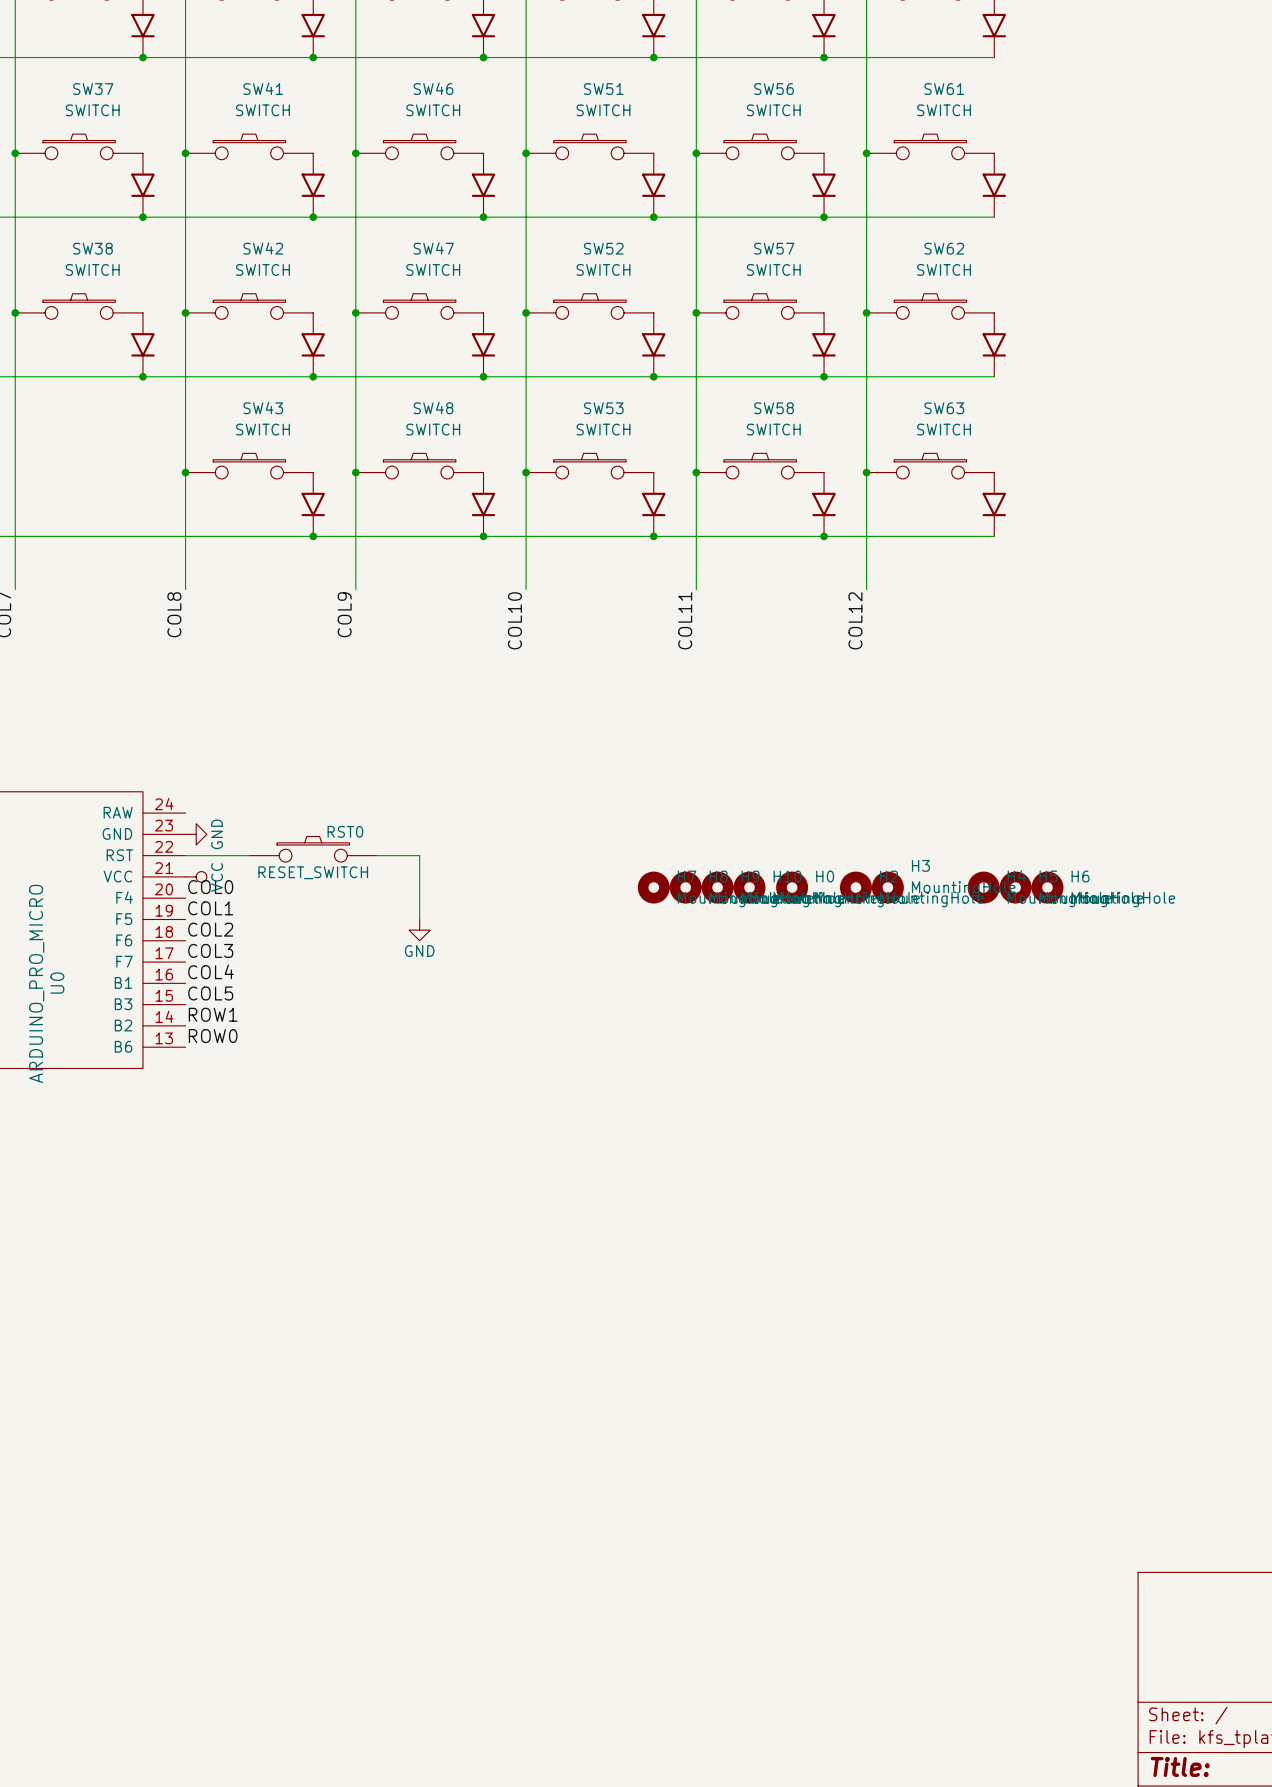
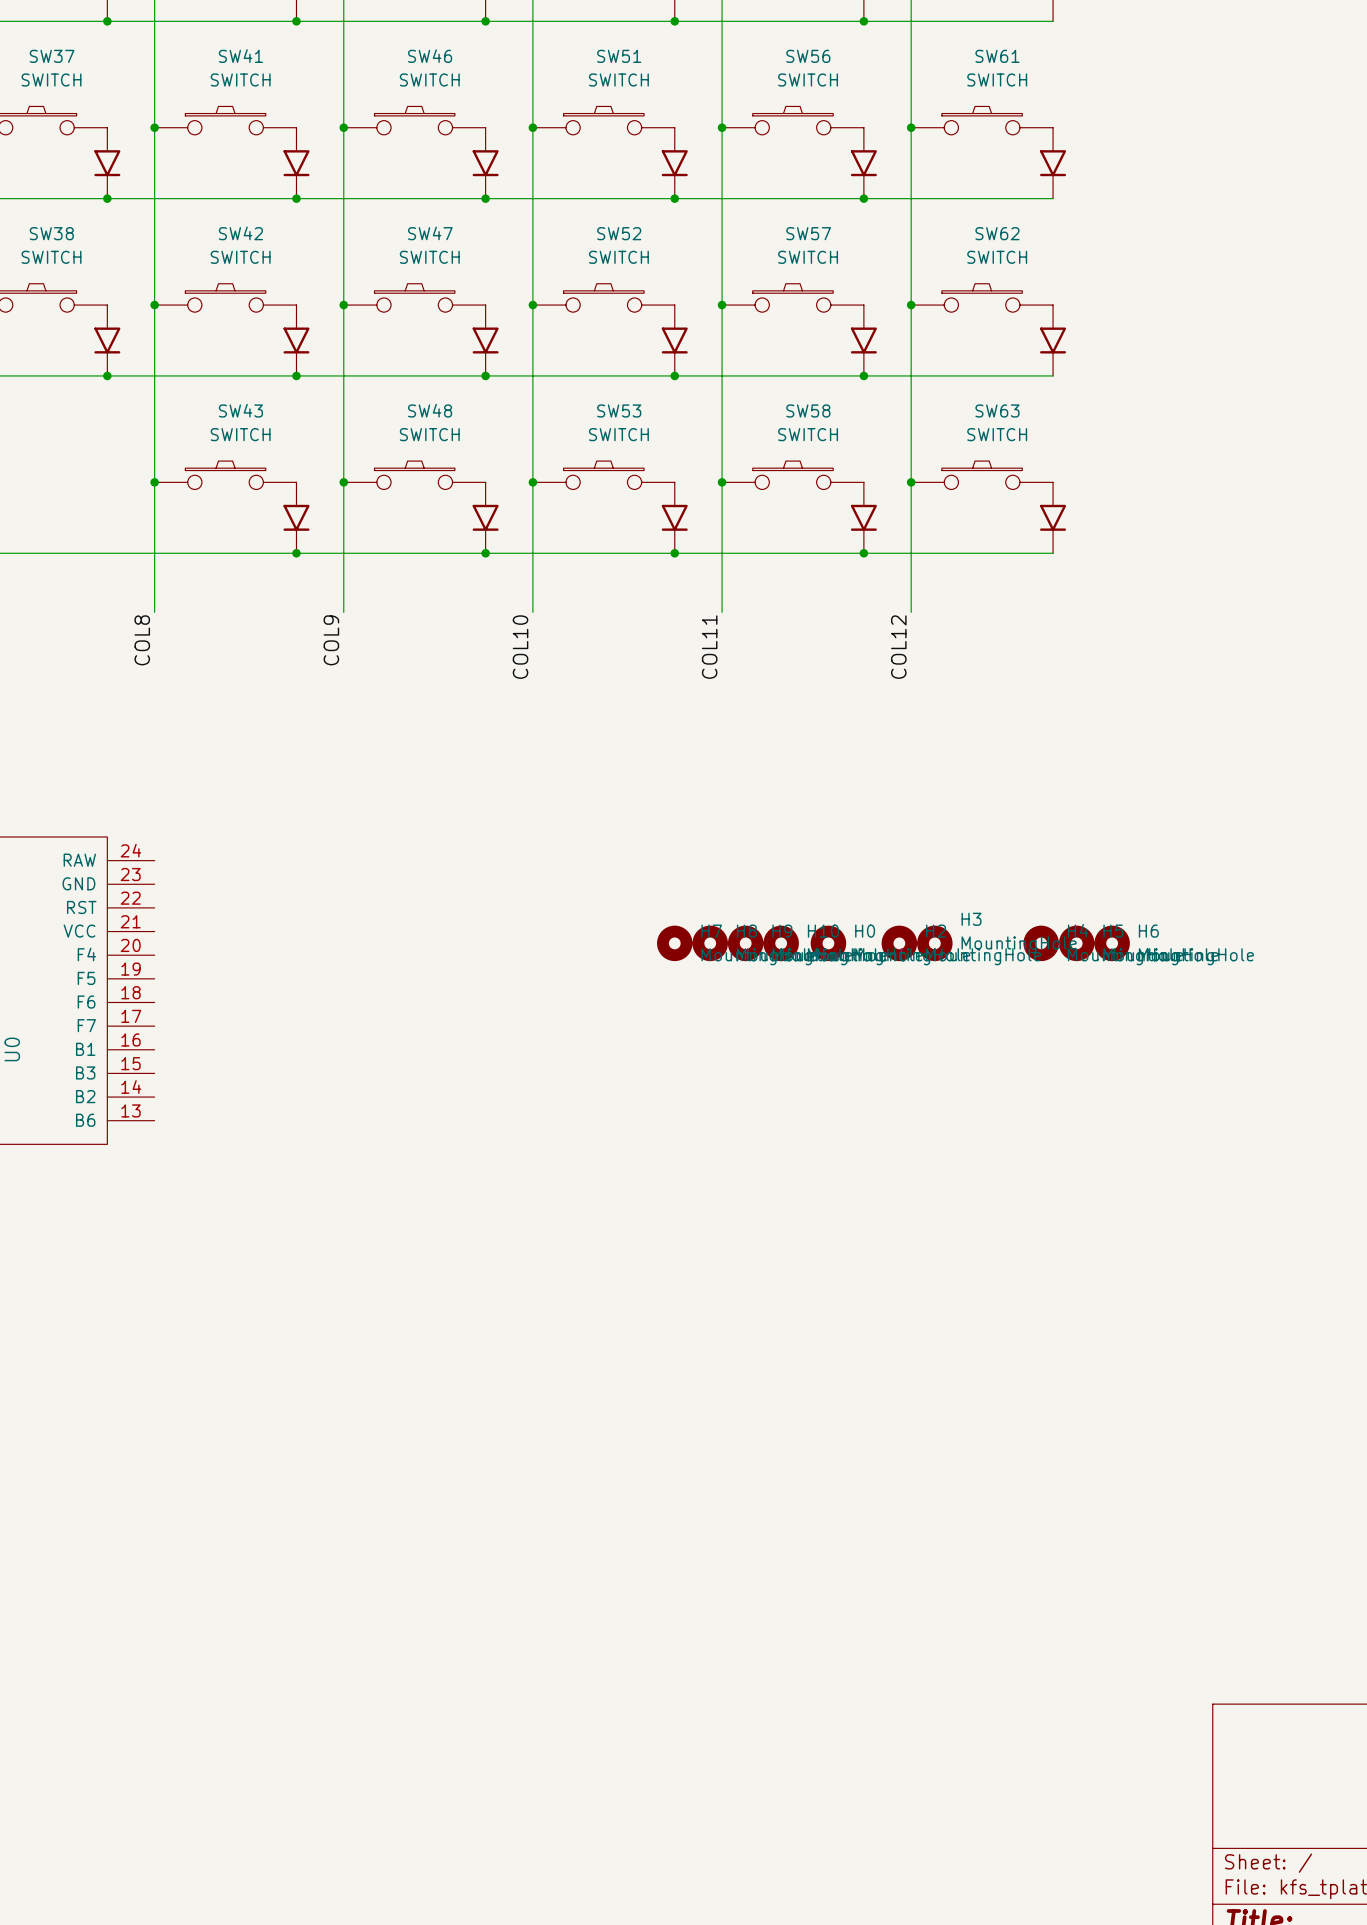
power symbol: GND (196, 834) -> none
RST0: RESET_SWITCH (313, 849) -> none
wire: (185, 855) (249, 855) -> none
wire: (377, 855) (419, 855) (419, 919) -> none
power symbol: VCC (196, 876) -> none
label: COL0 (210, 887) -> none
label: COL1 (210, 908) -> none
label: COL2 (210, 929) -> none
power symbol: GND (419, 930) -> none
label: COL3 (210, 950) -> none
label: COL4 (211, 971) -> none
label: COL5 (210, 993) -> none
label: ROW1 (213, 1014) -> none
label: ROW0 (213, 1036) -> none

